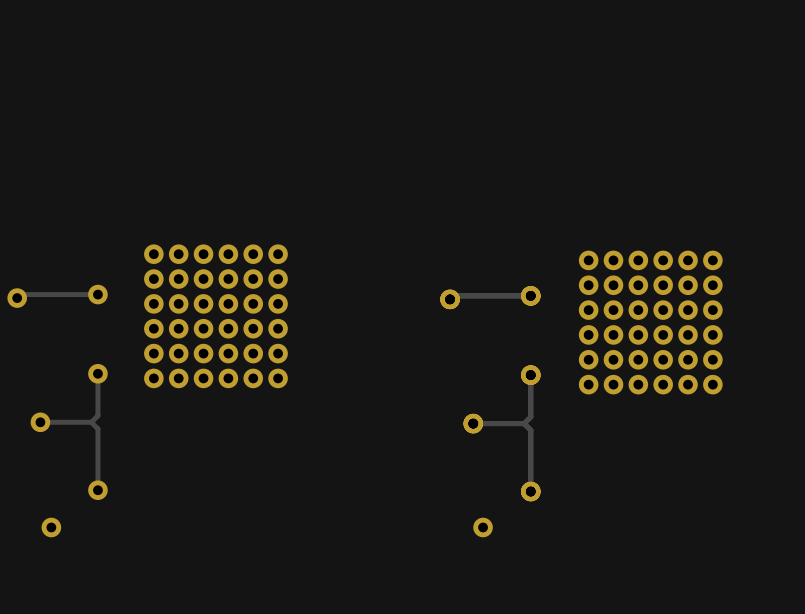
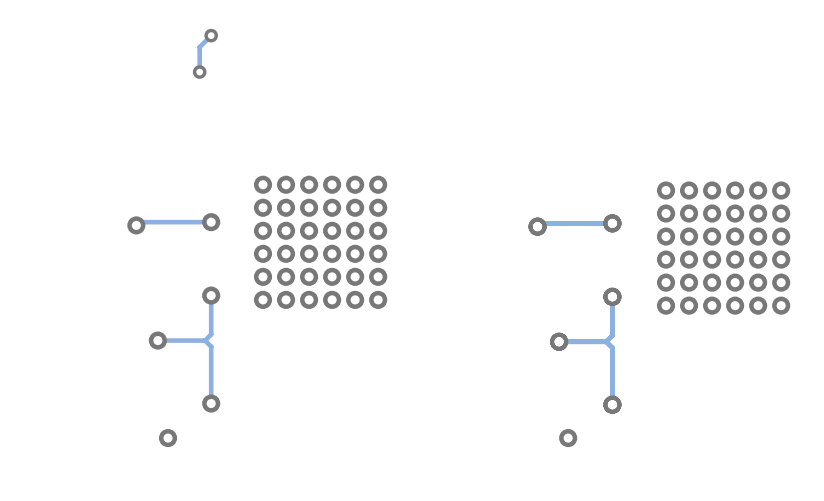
track: none -> (211, 35) (199, 47) (199, 72)
via: none -> (211, 35)
via: none -> (199, 72)

